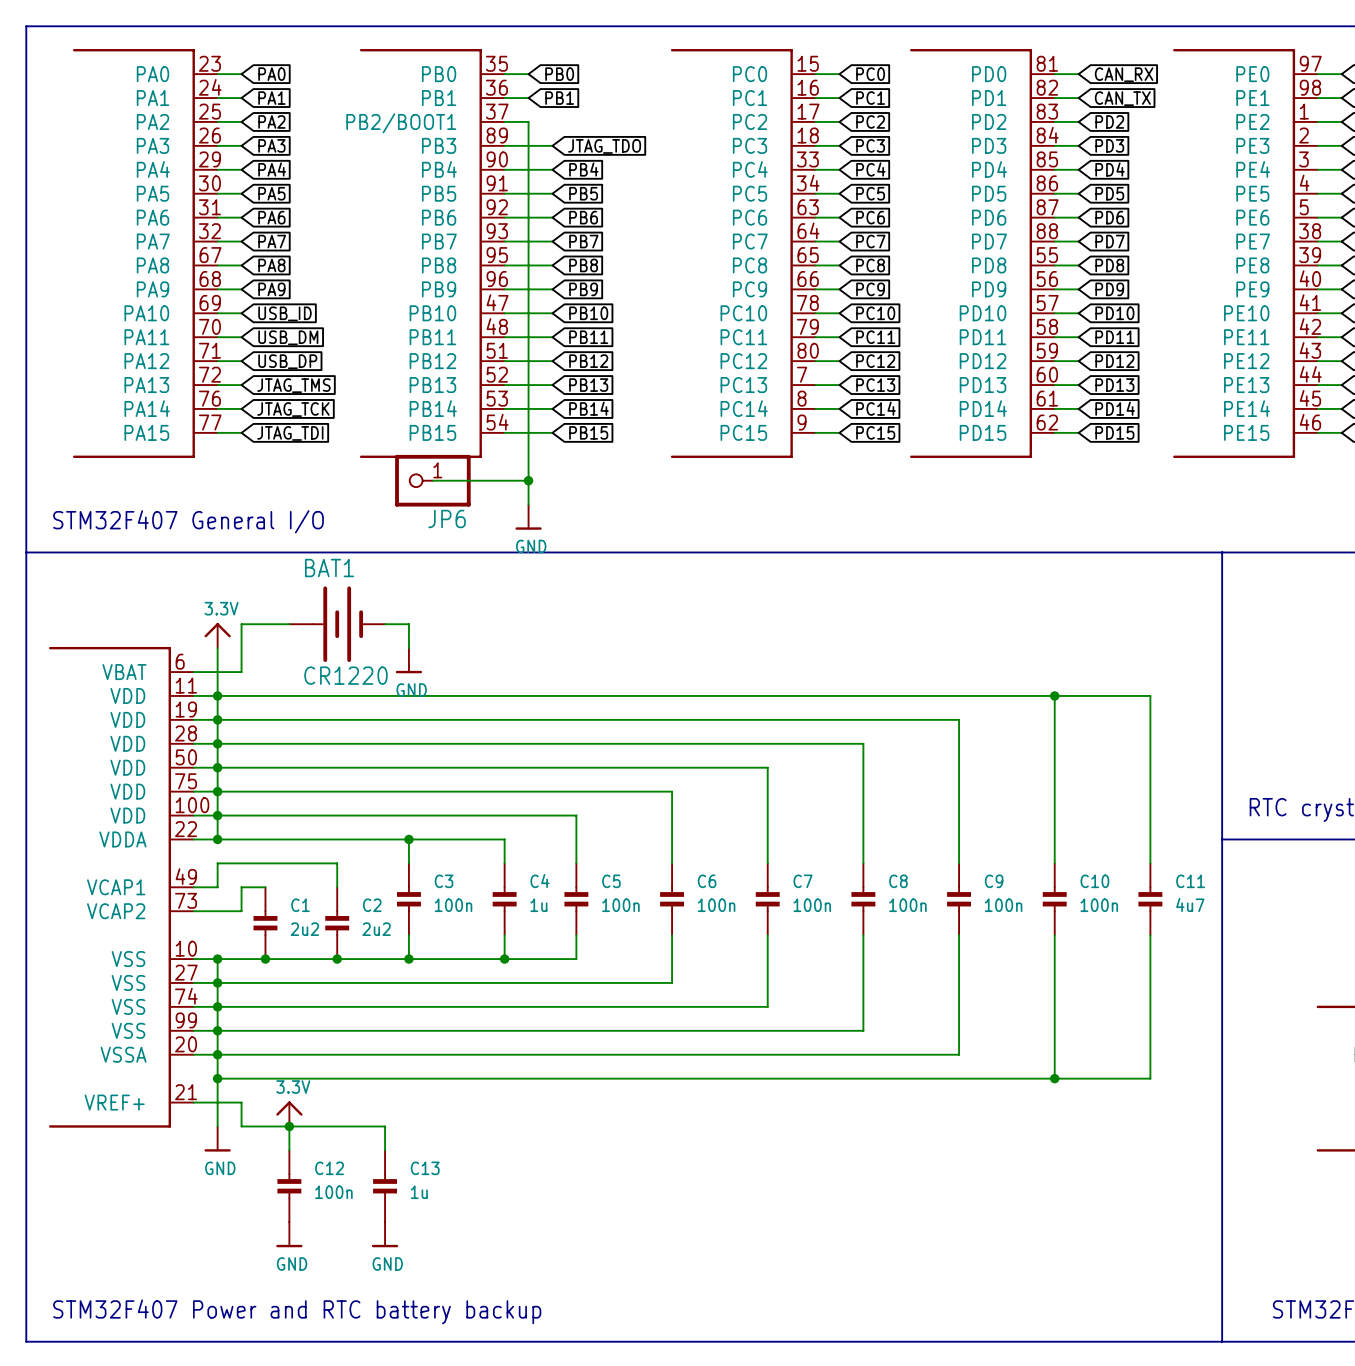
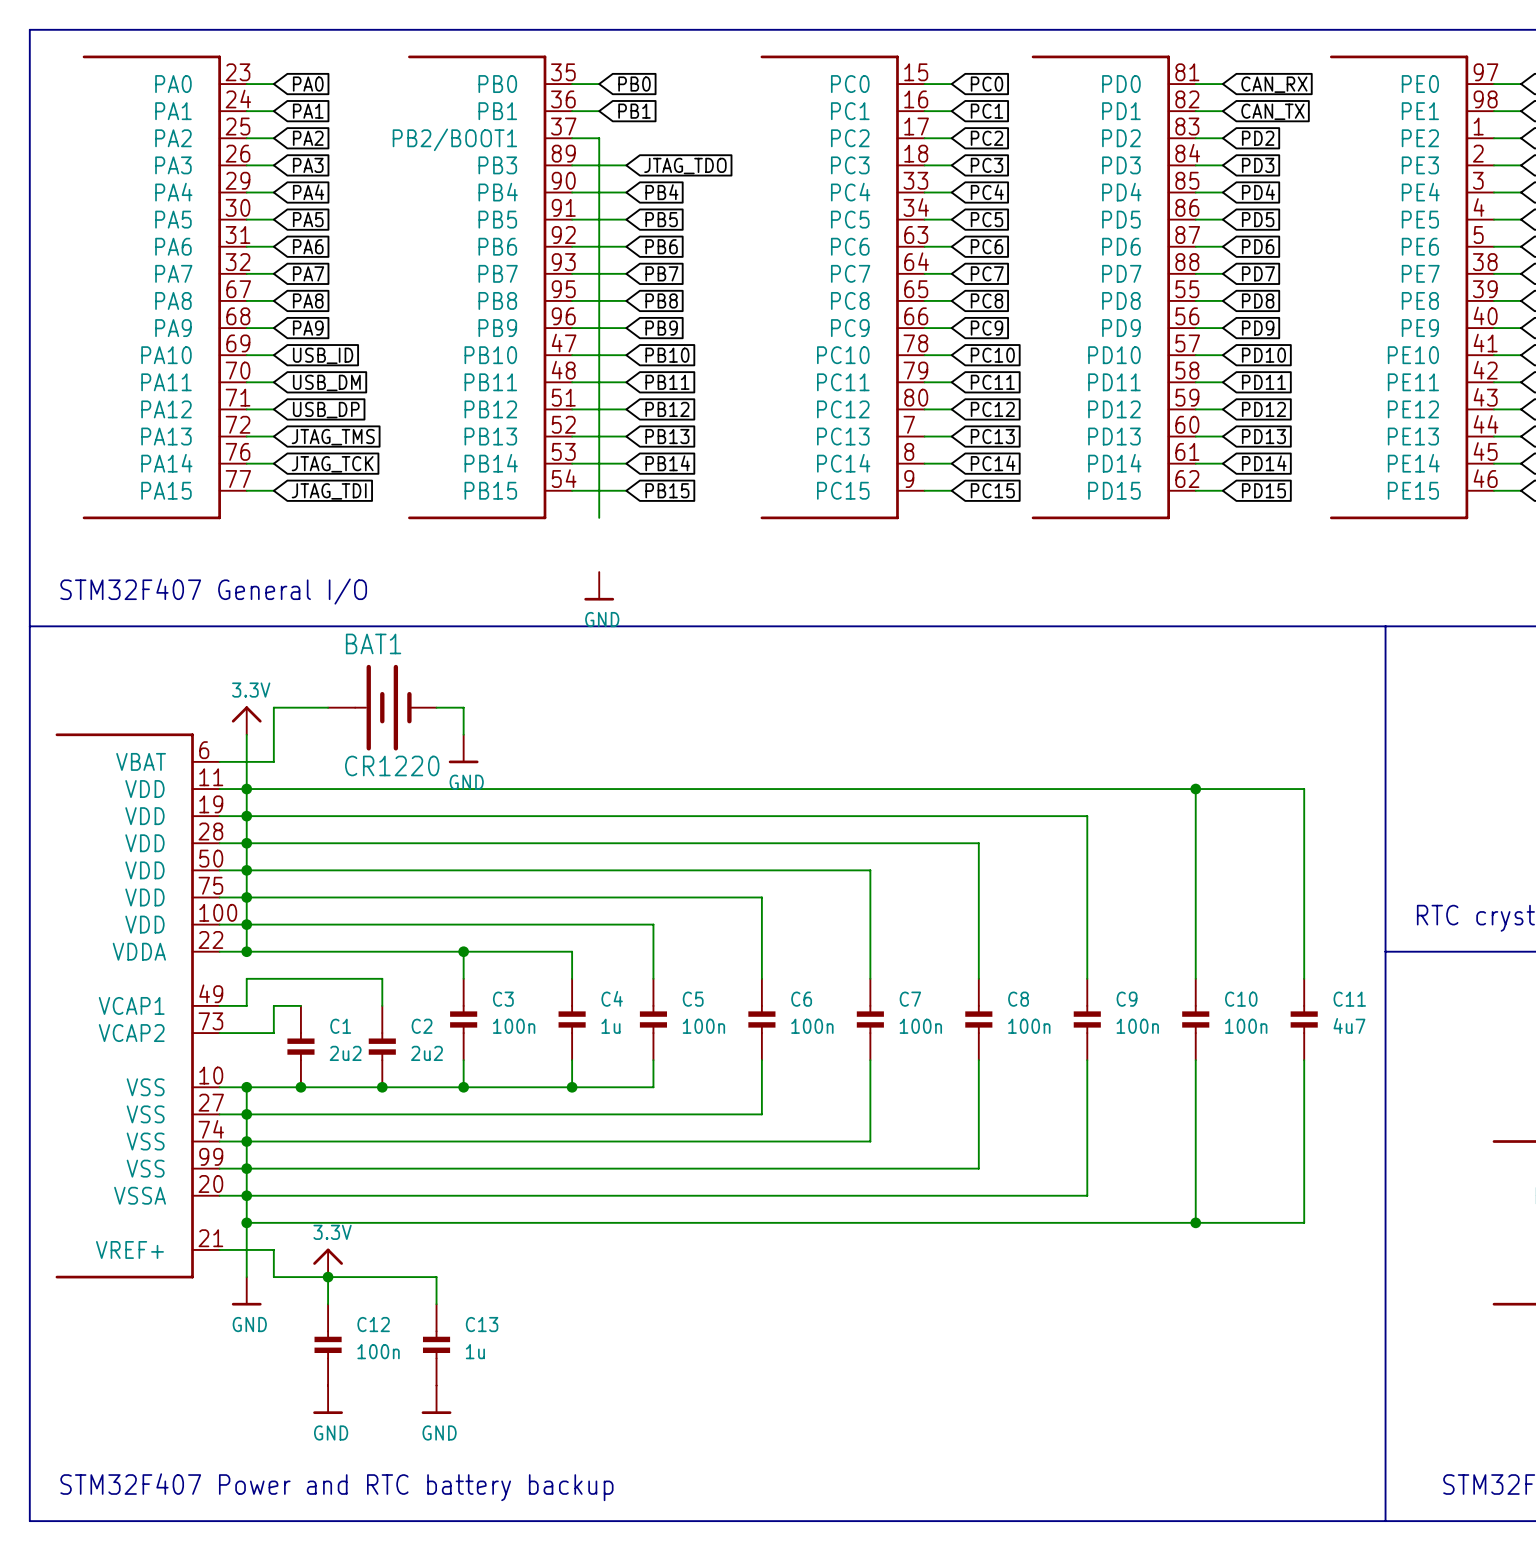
wire: (528, 456) (528, 504) -> none
wire: (432, 480) (528, 480) -> none
JP6: (432, 480) -> none
junction: (528, 480) -> none

